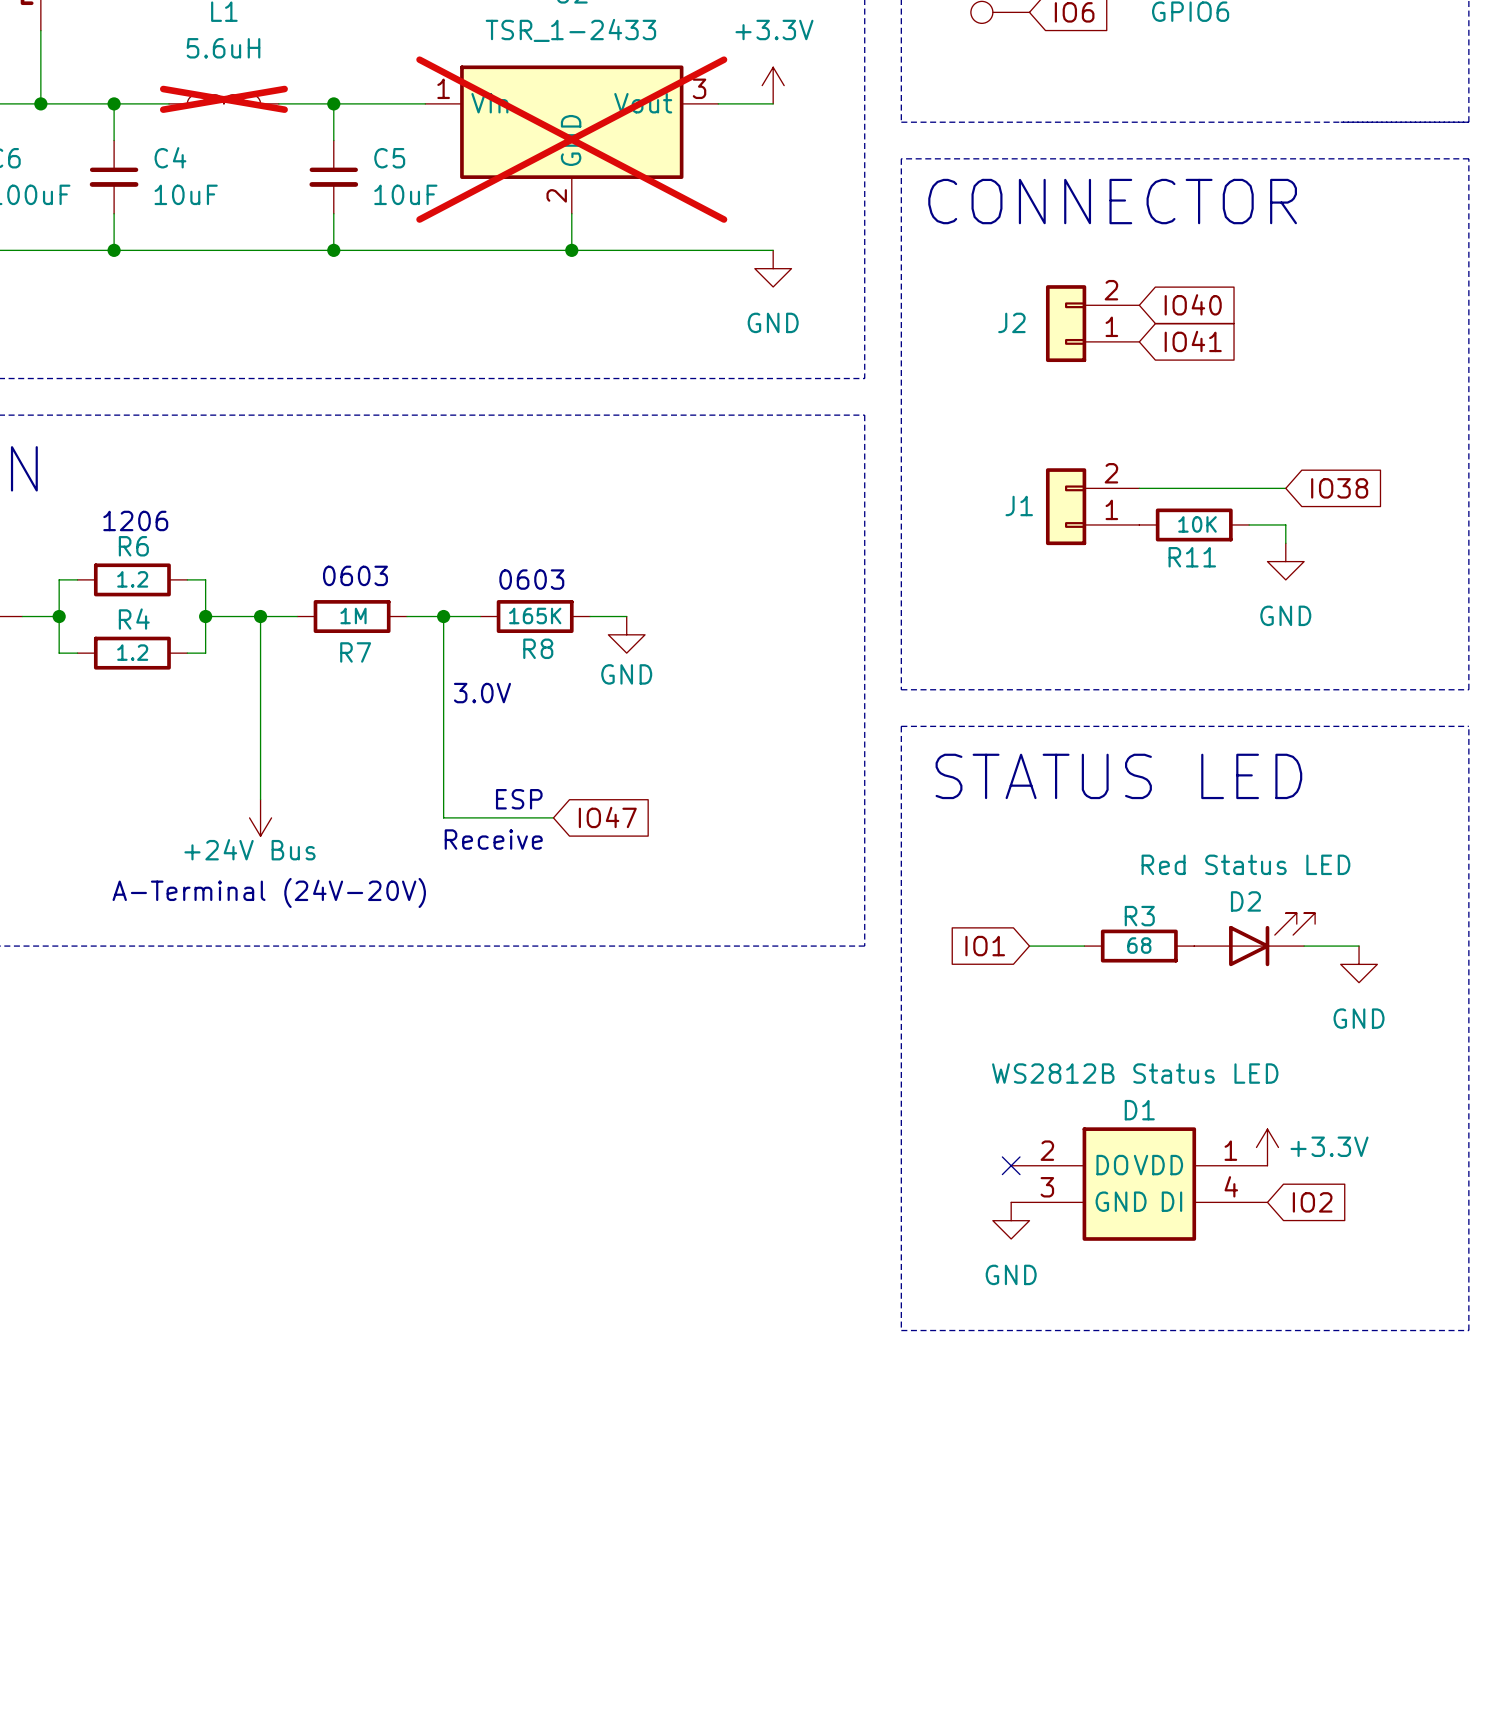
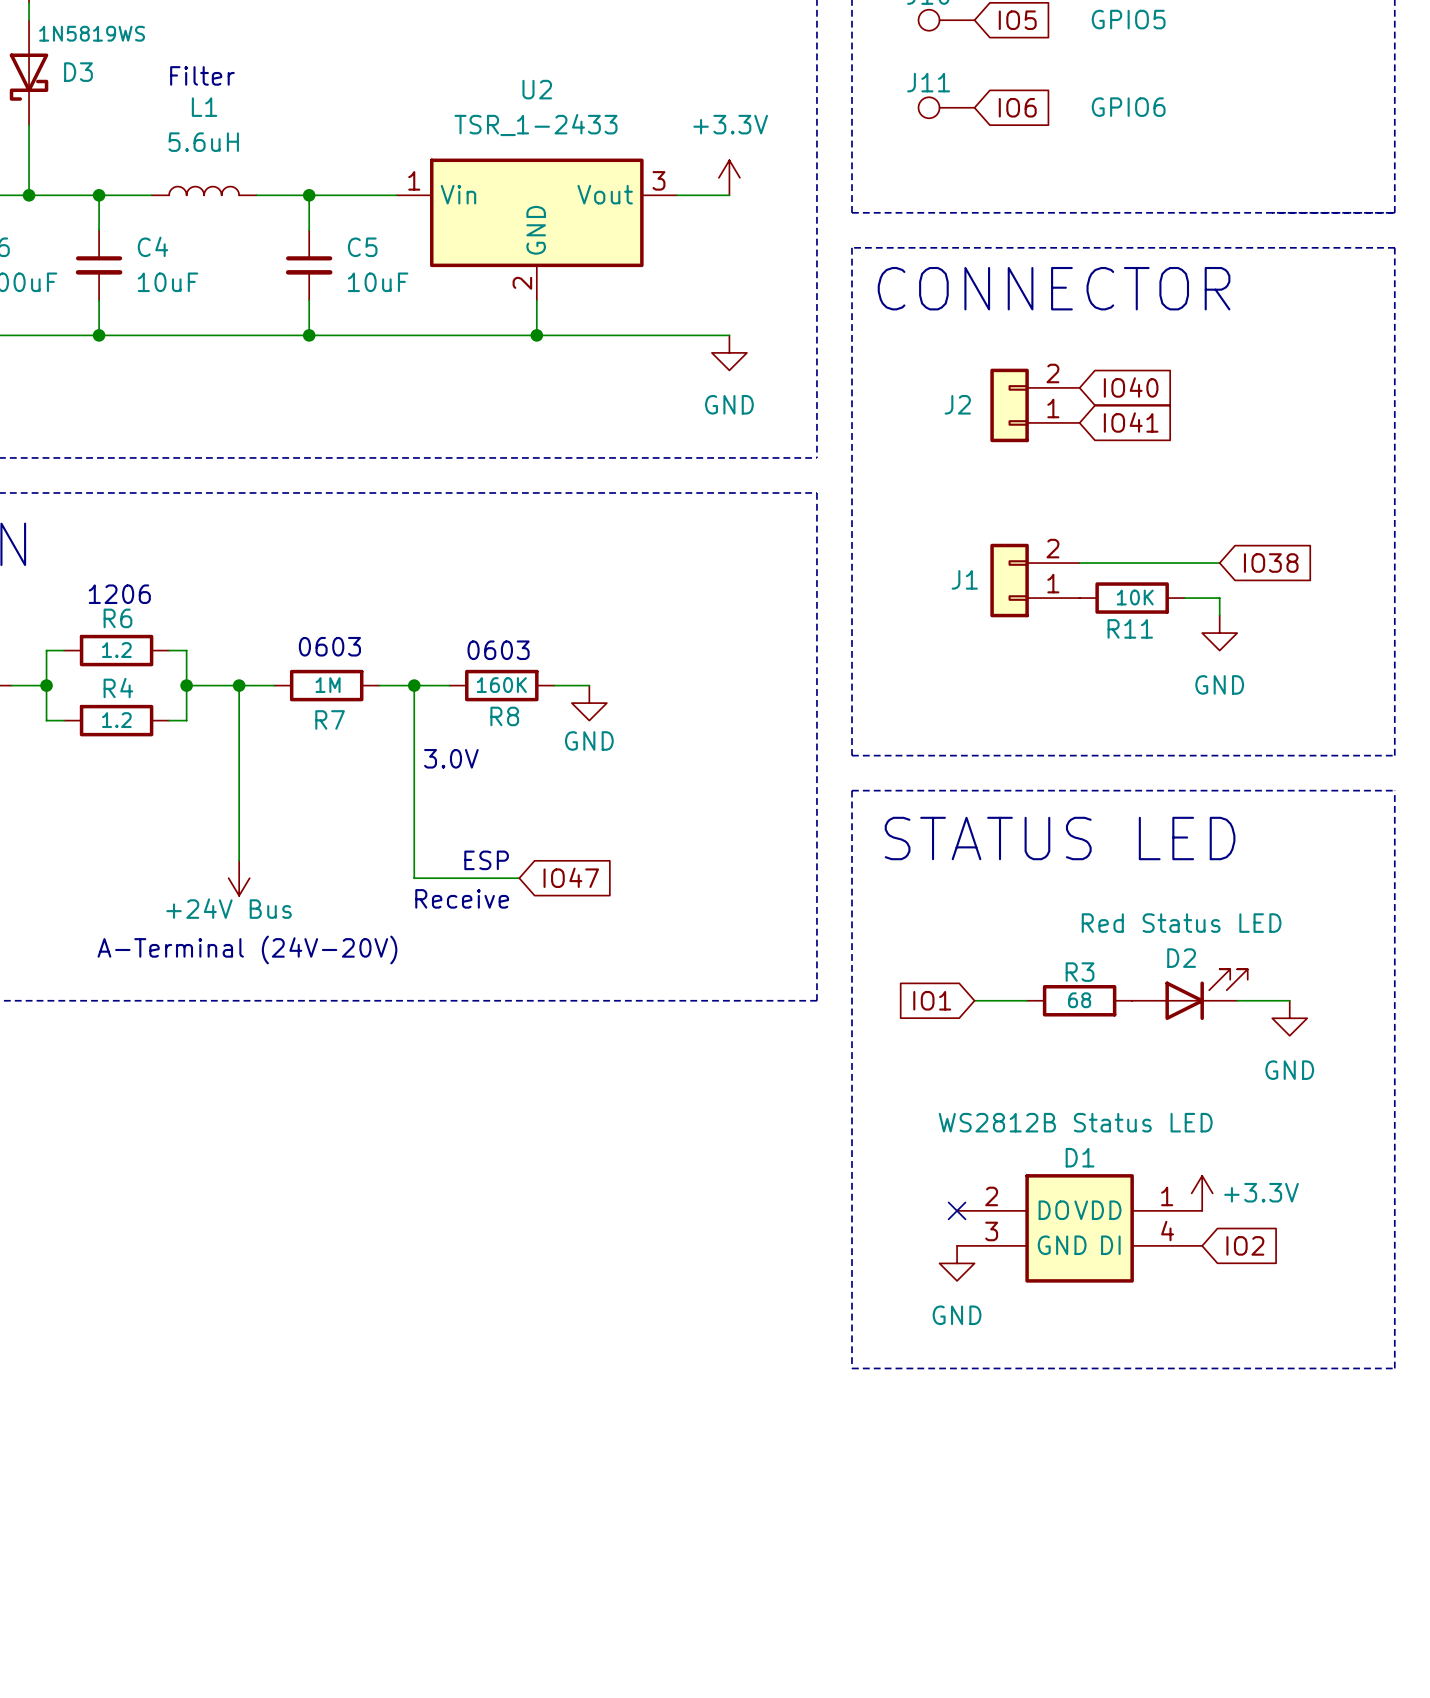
L1 do-not-place cross: (223, 99) -> none
U2 do-not-place cross: (571, 139) -> none
R8 value: 165K (535, 615) -> 160K (501, 685)

